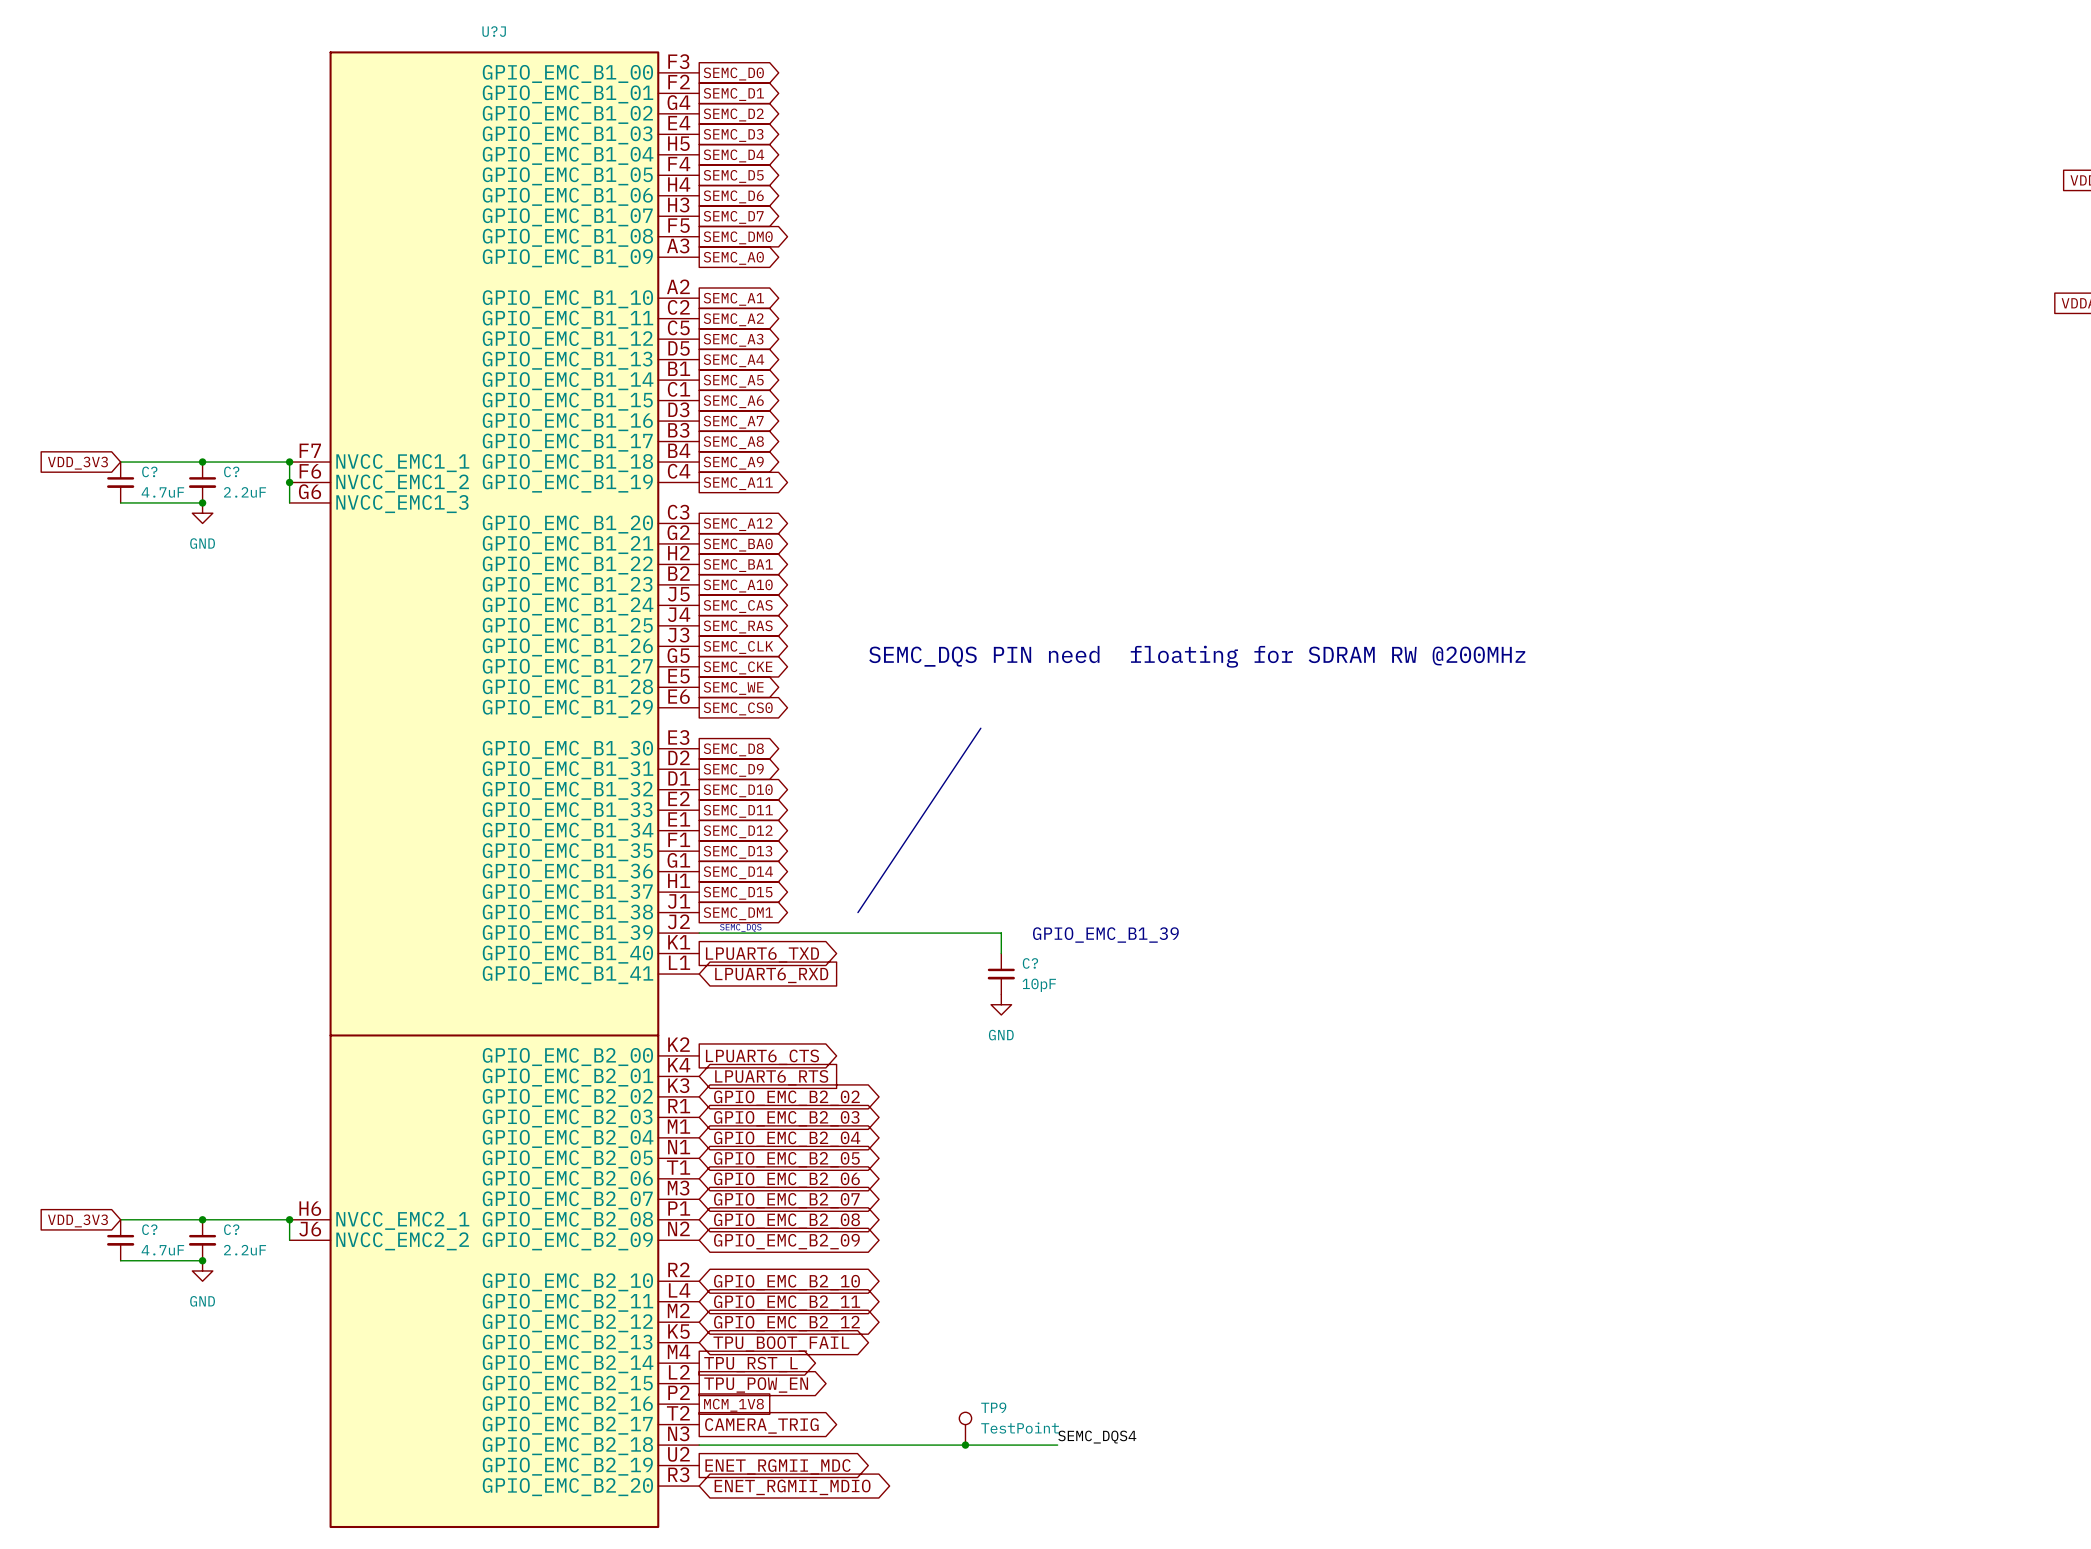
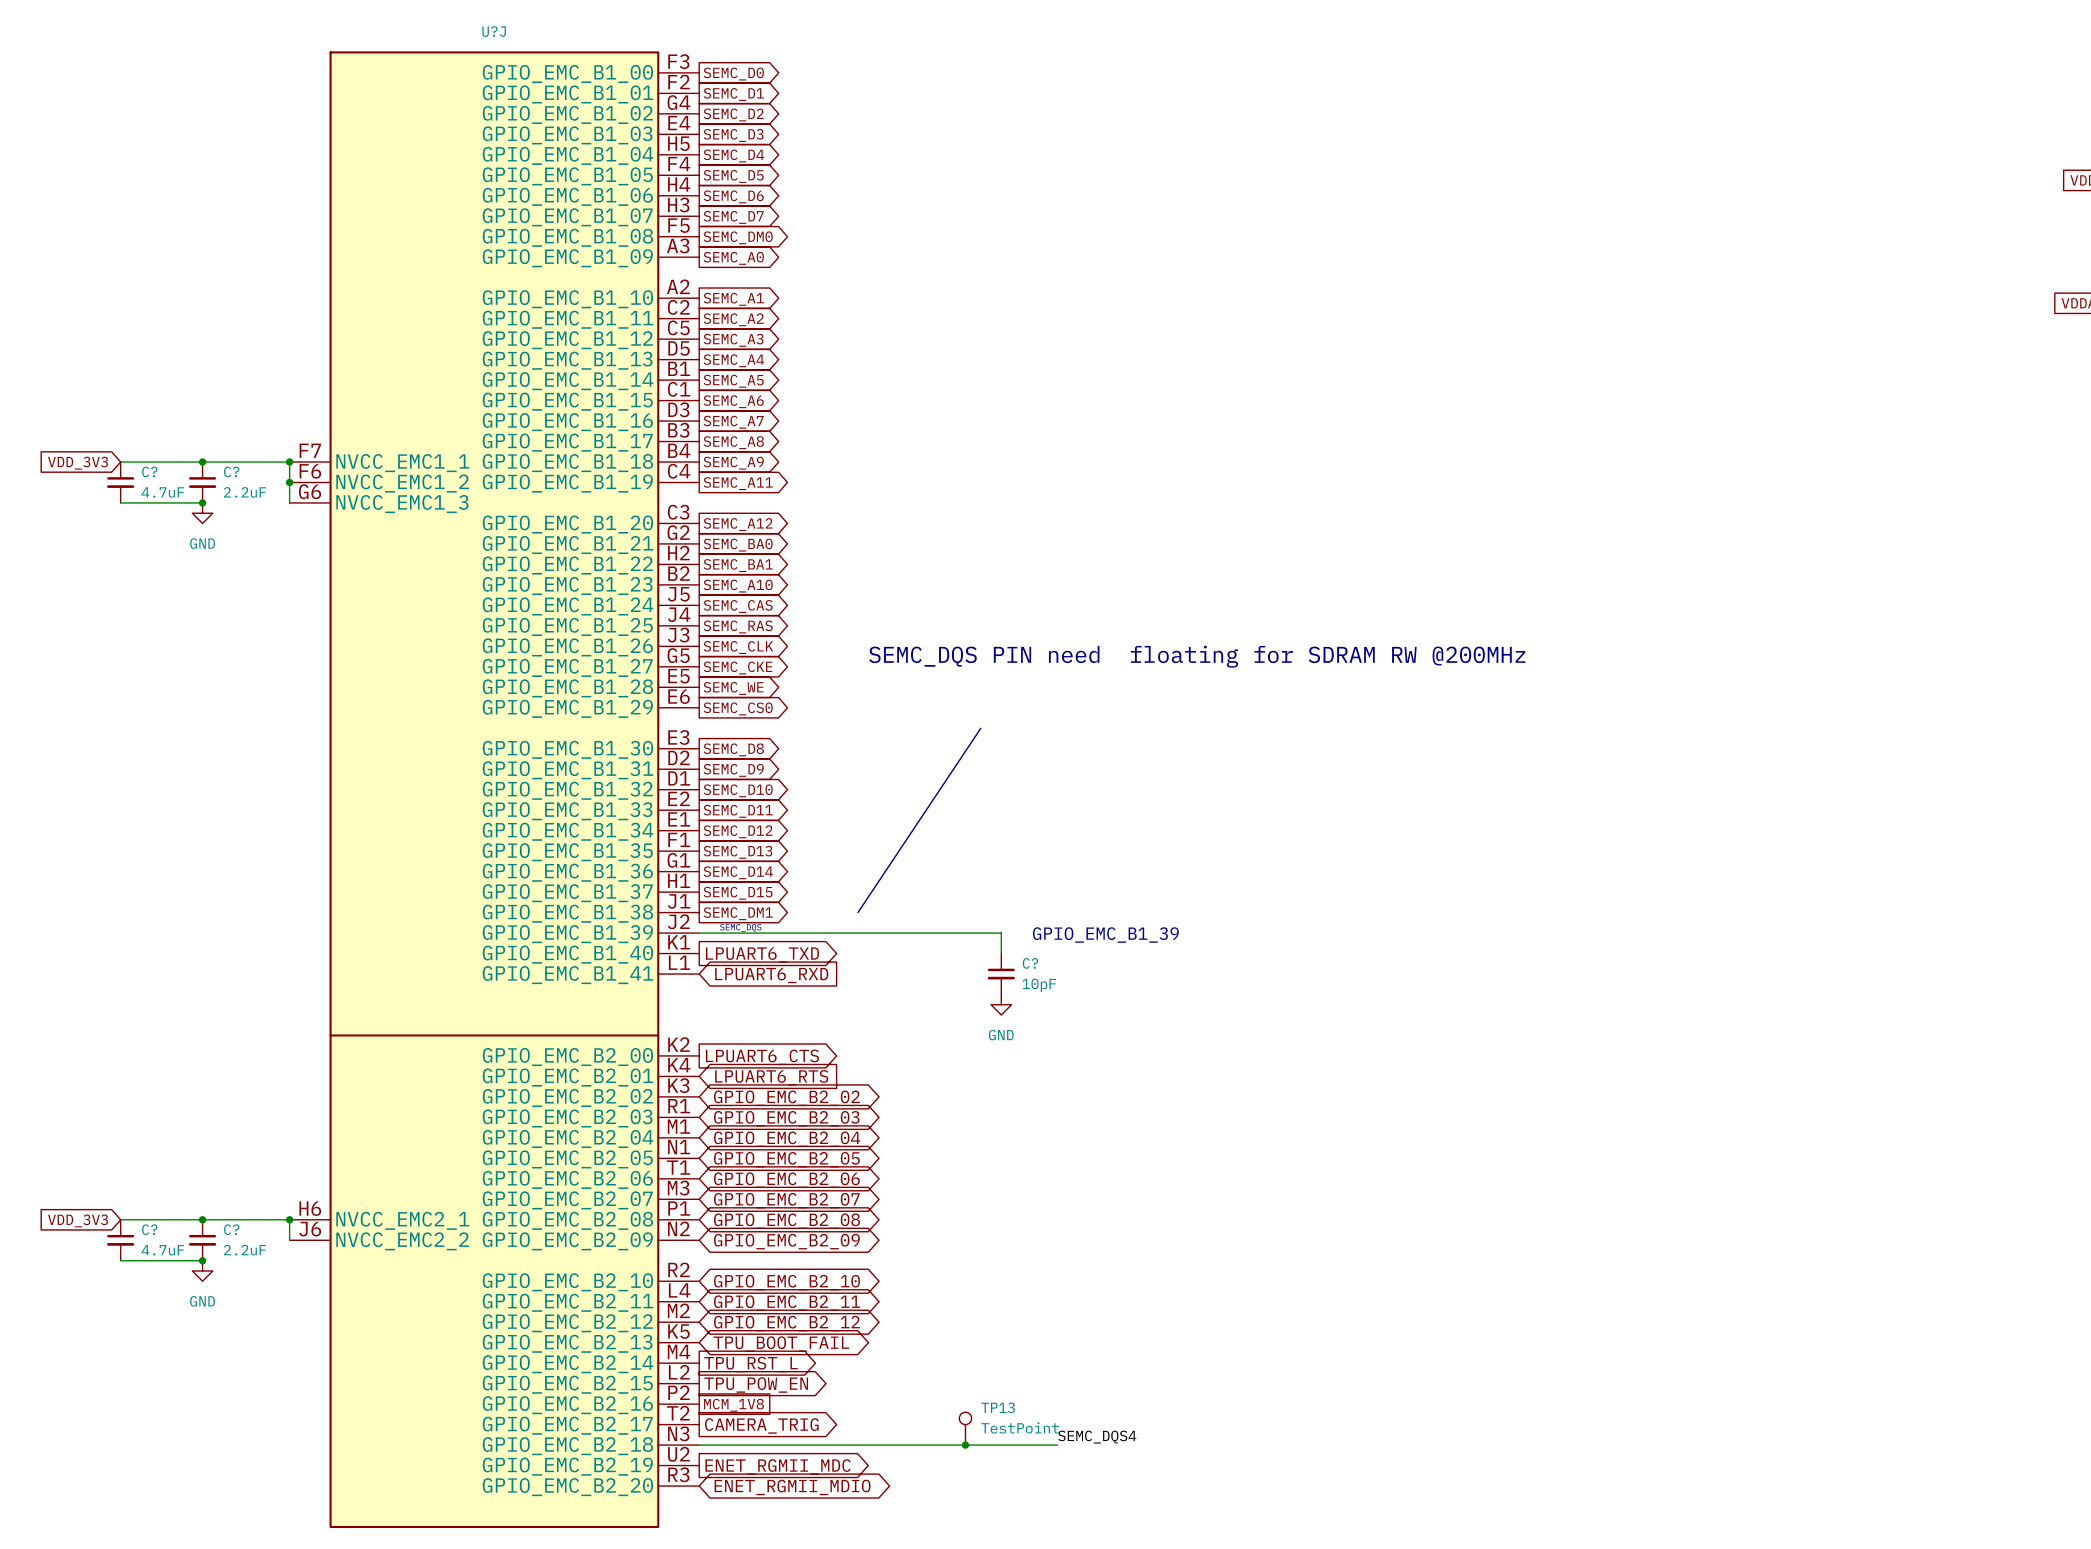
TP9 name: TP9 (993, 1407) -> TP13 (998, 1407)

